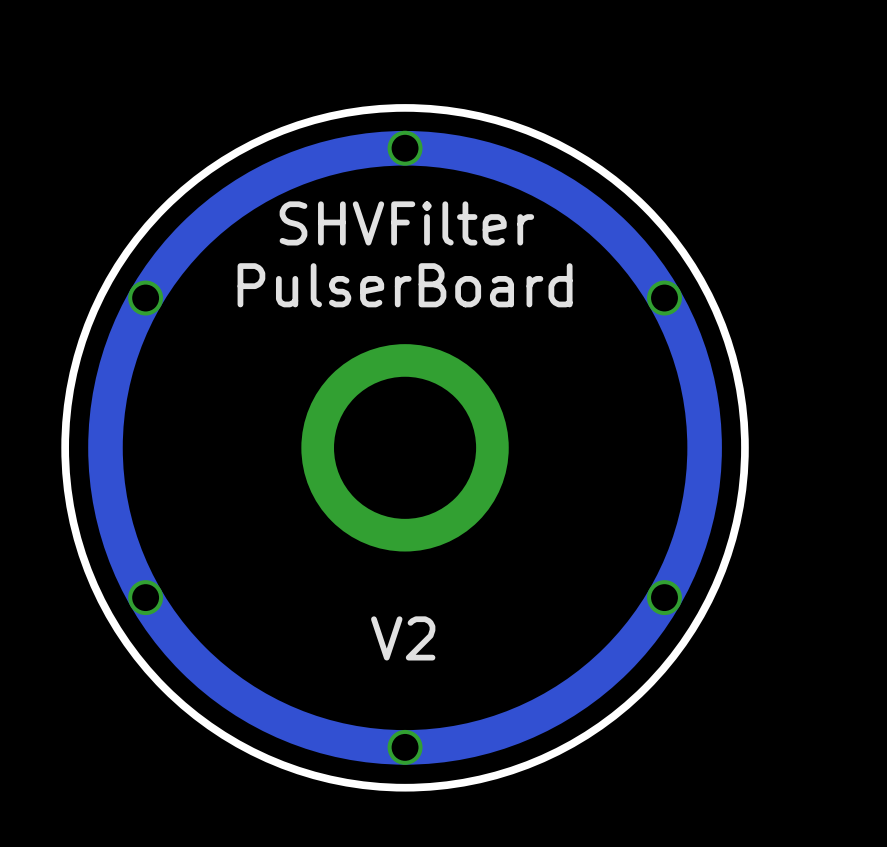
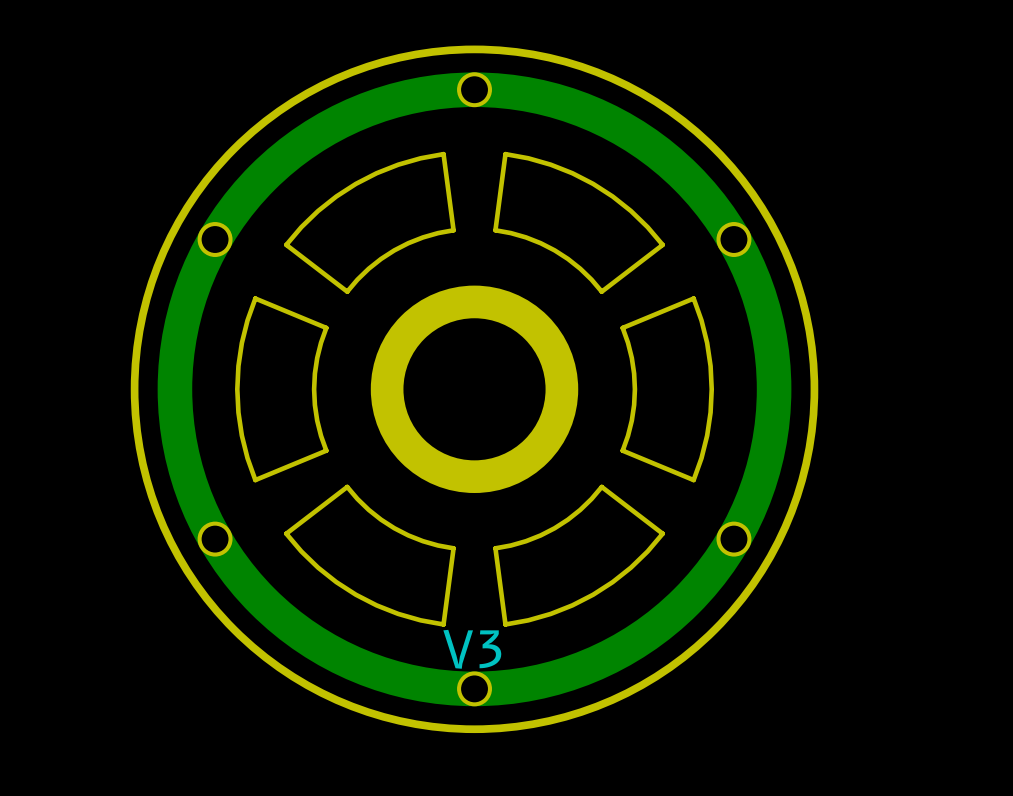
text: SHVFilter (406, 223) -> none
part: none -> (369, 222)
part: none -> (579, 222)
text: PulserBoard (405, 285) -> none
part: none -> (281, 389)
part: none -> (667, 389)
part: none -> (369, 555)
part: none -> (579, 555)
text: V2 (403, 638) -> none
text: none -> V3 (472, 649)

